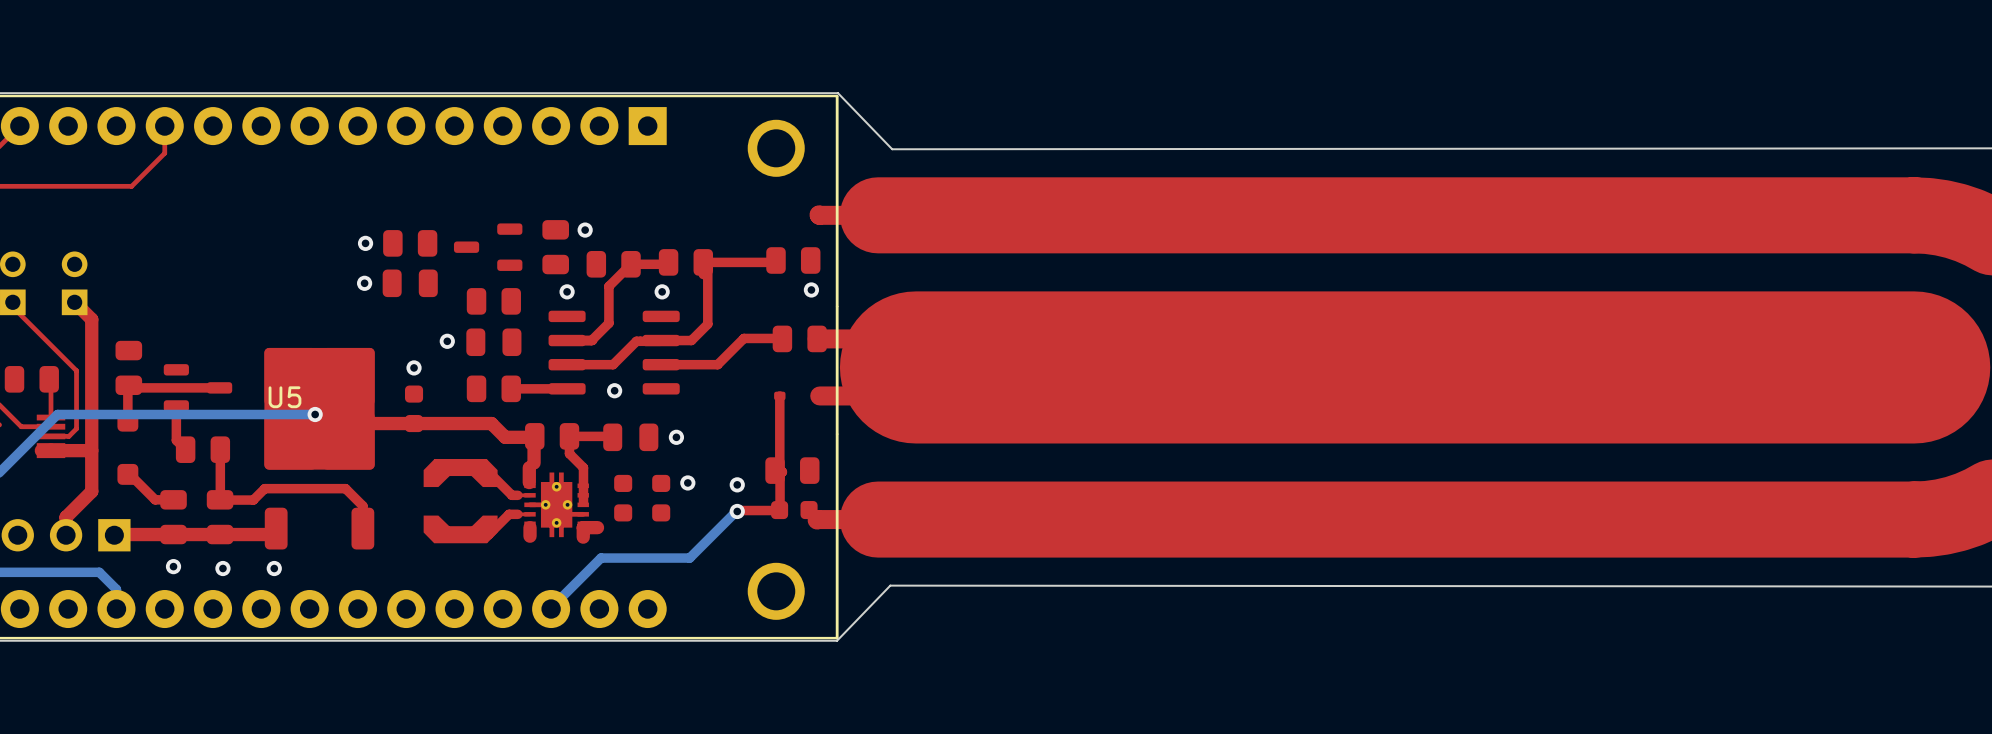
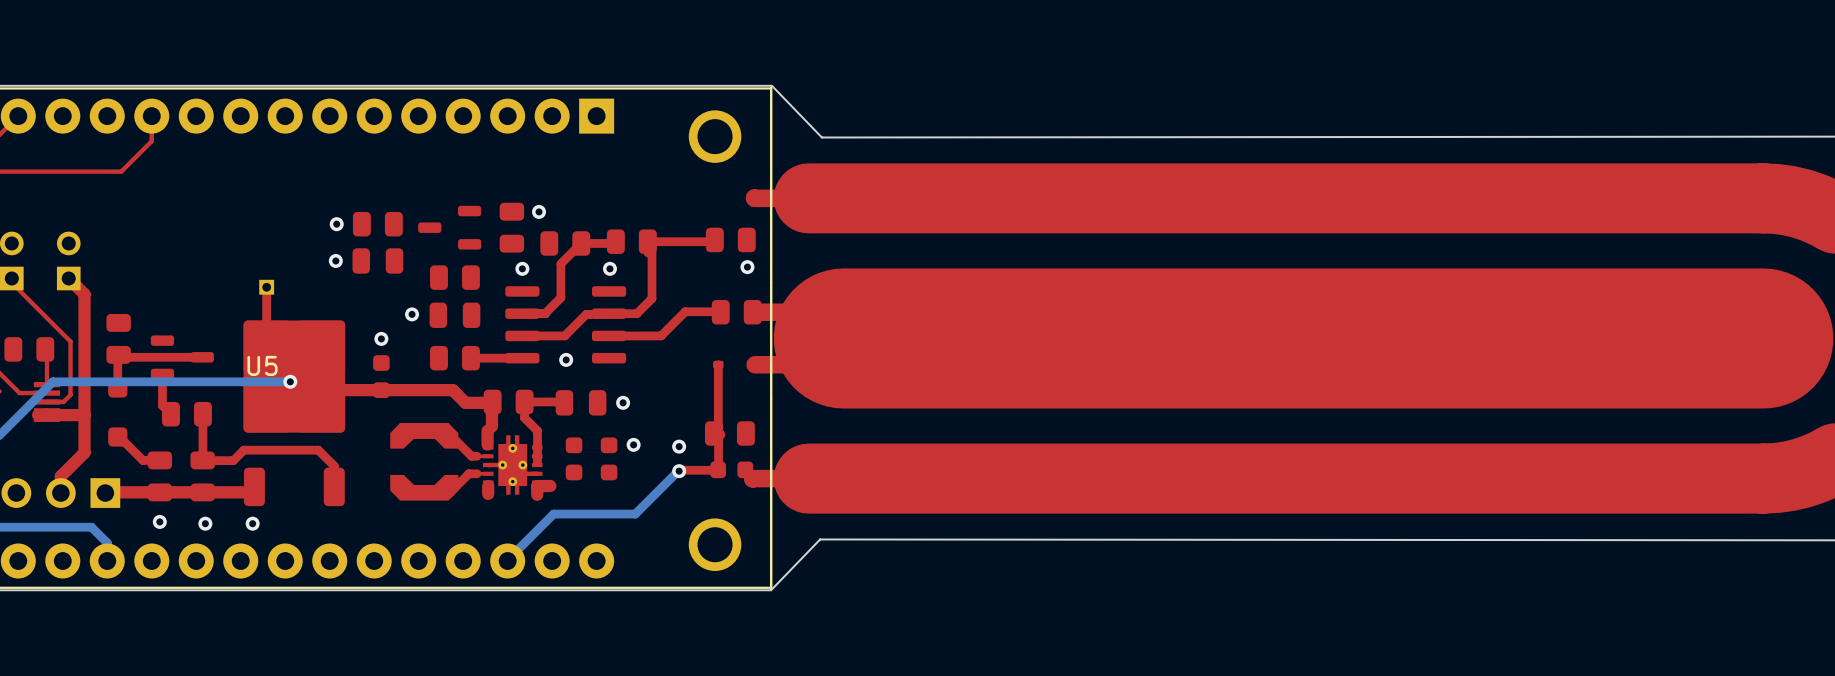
top track: none -> (266, 287) (267, 347)
part: none -> (266, 287)

